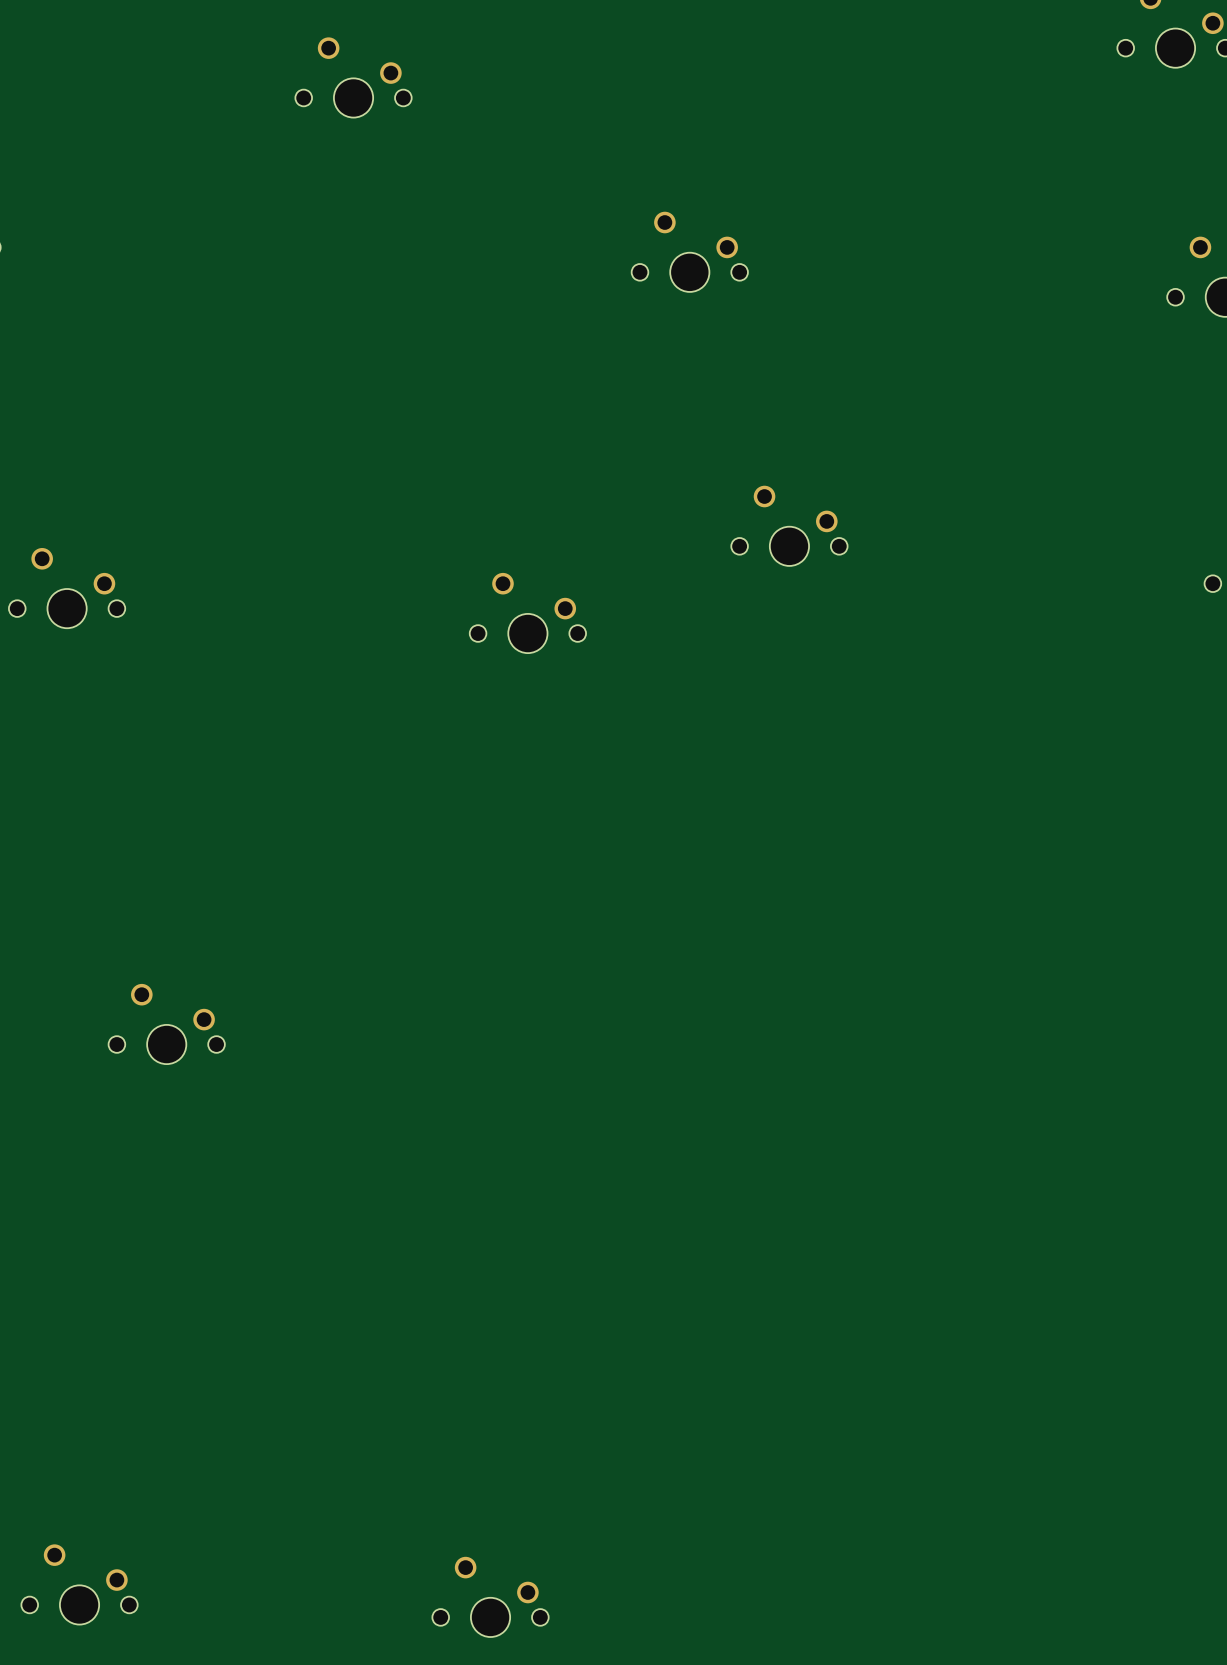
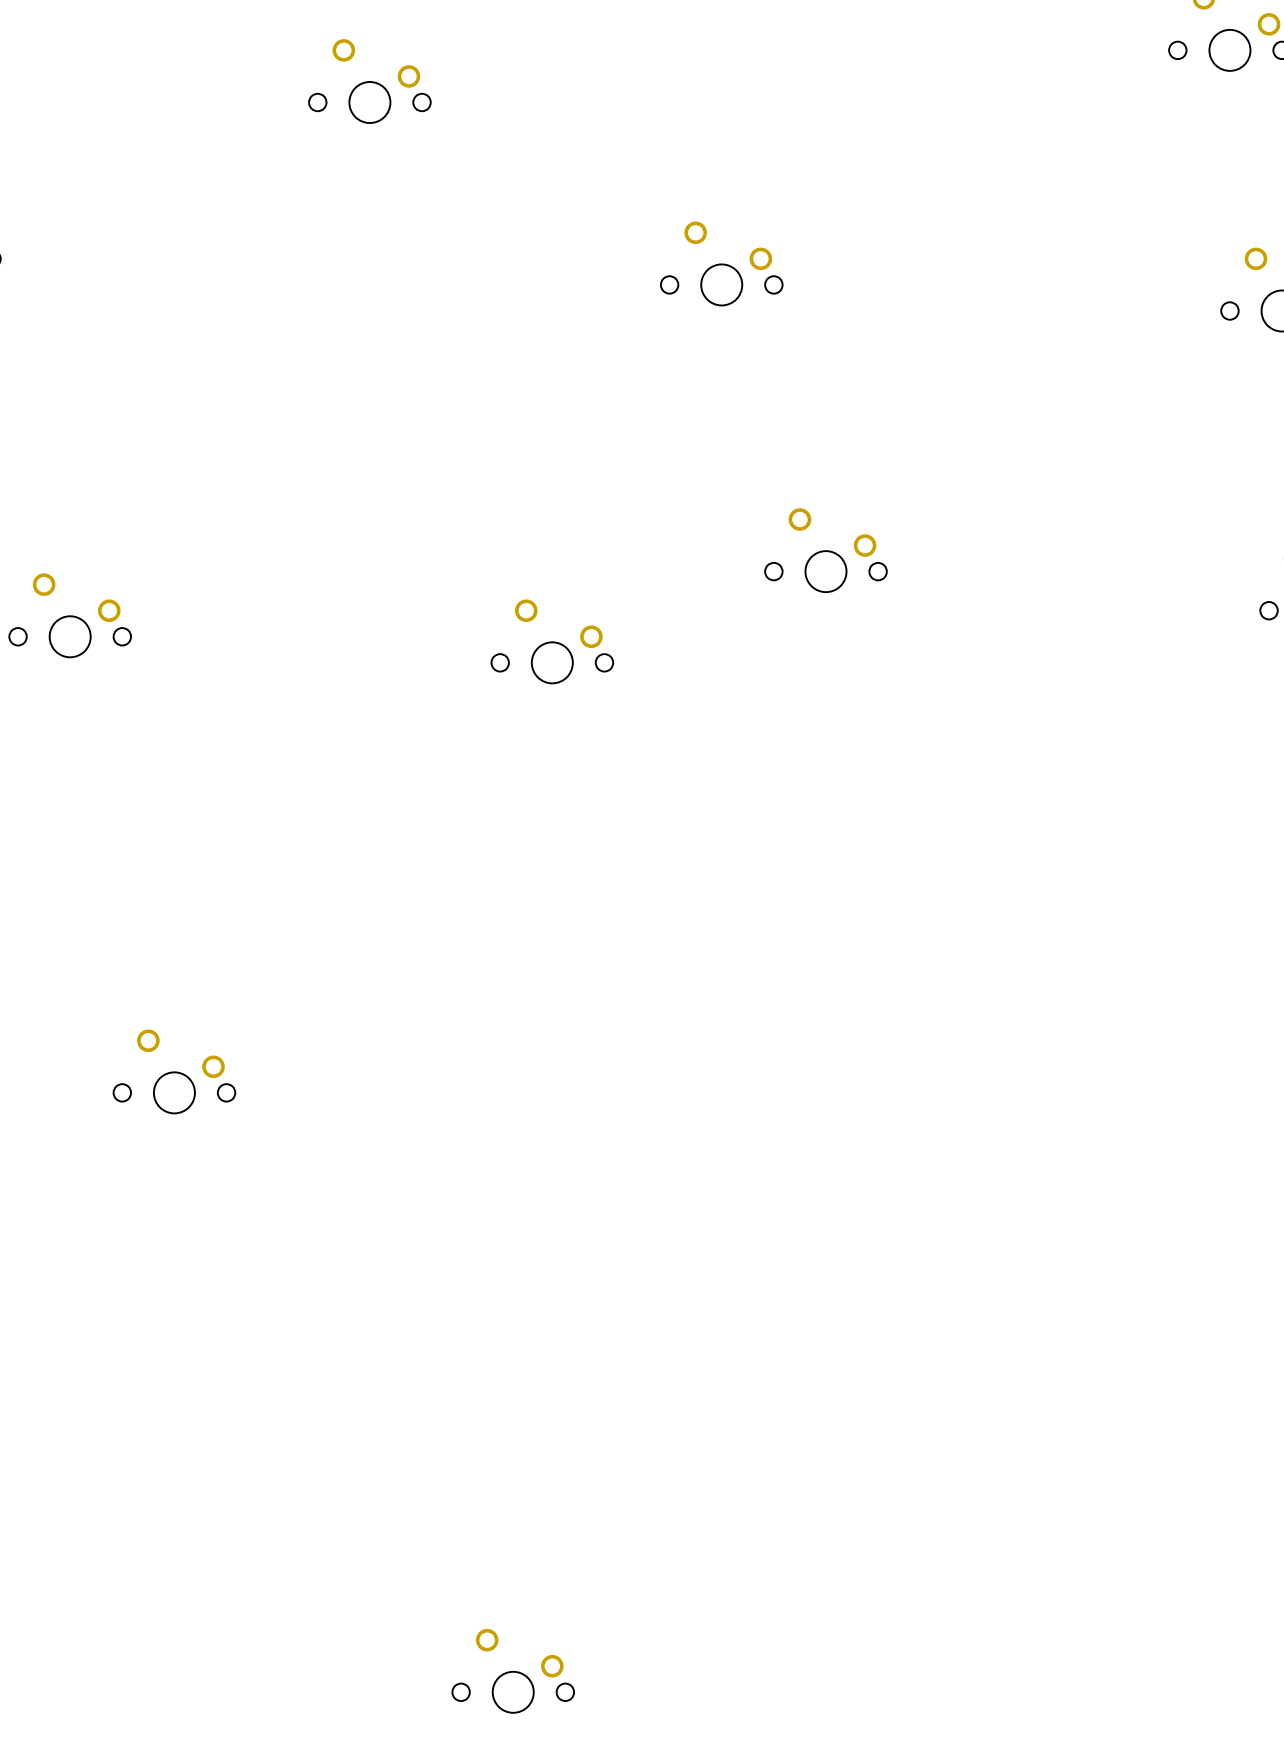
part: (79, 1584) -> none

